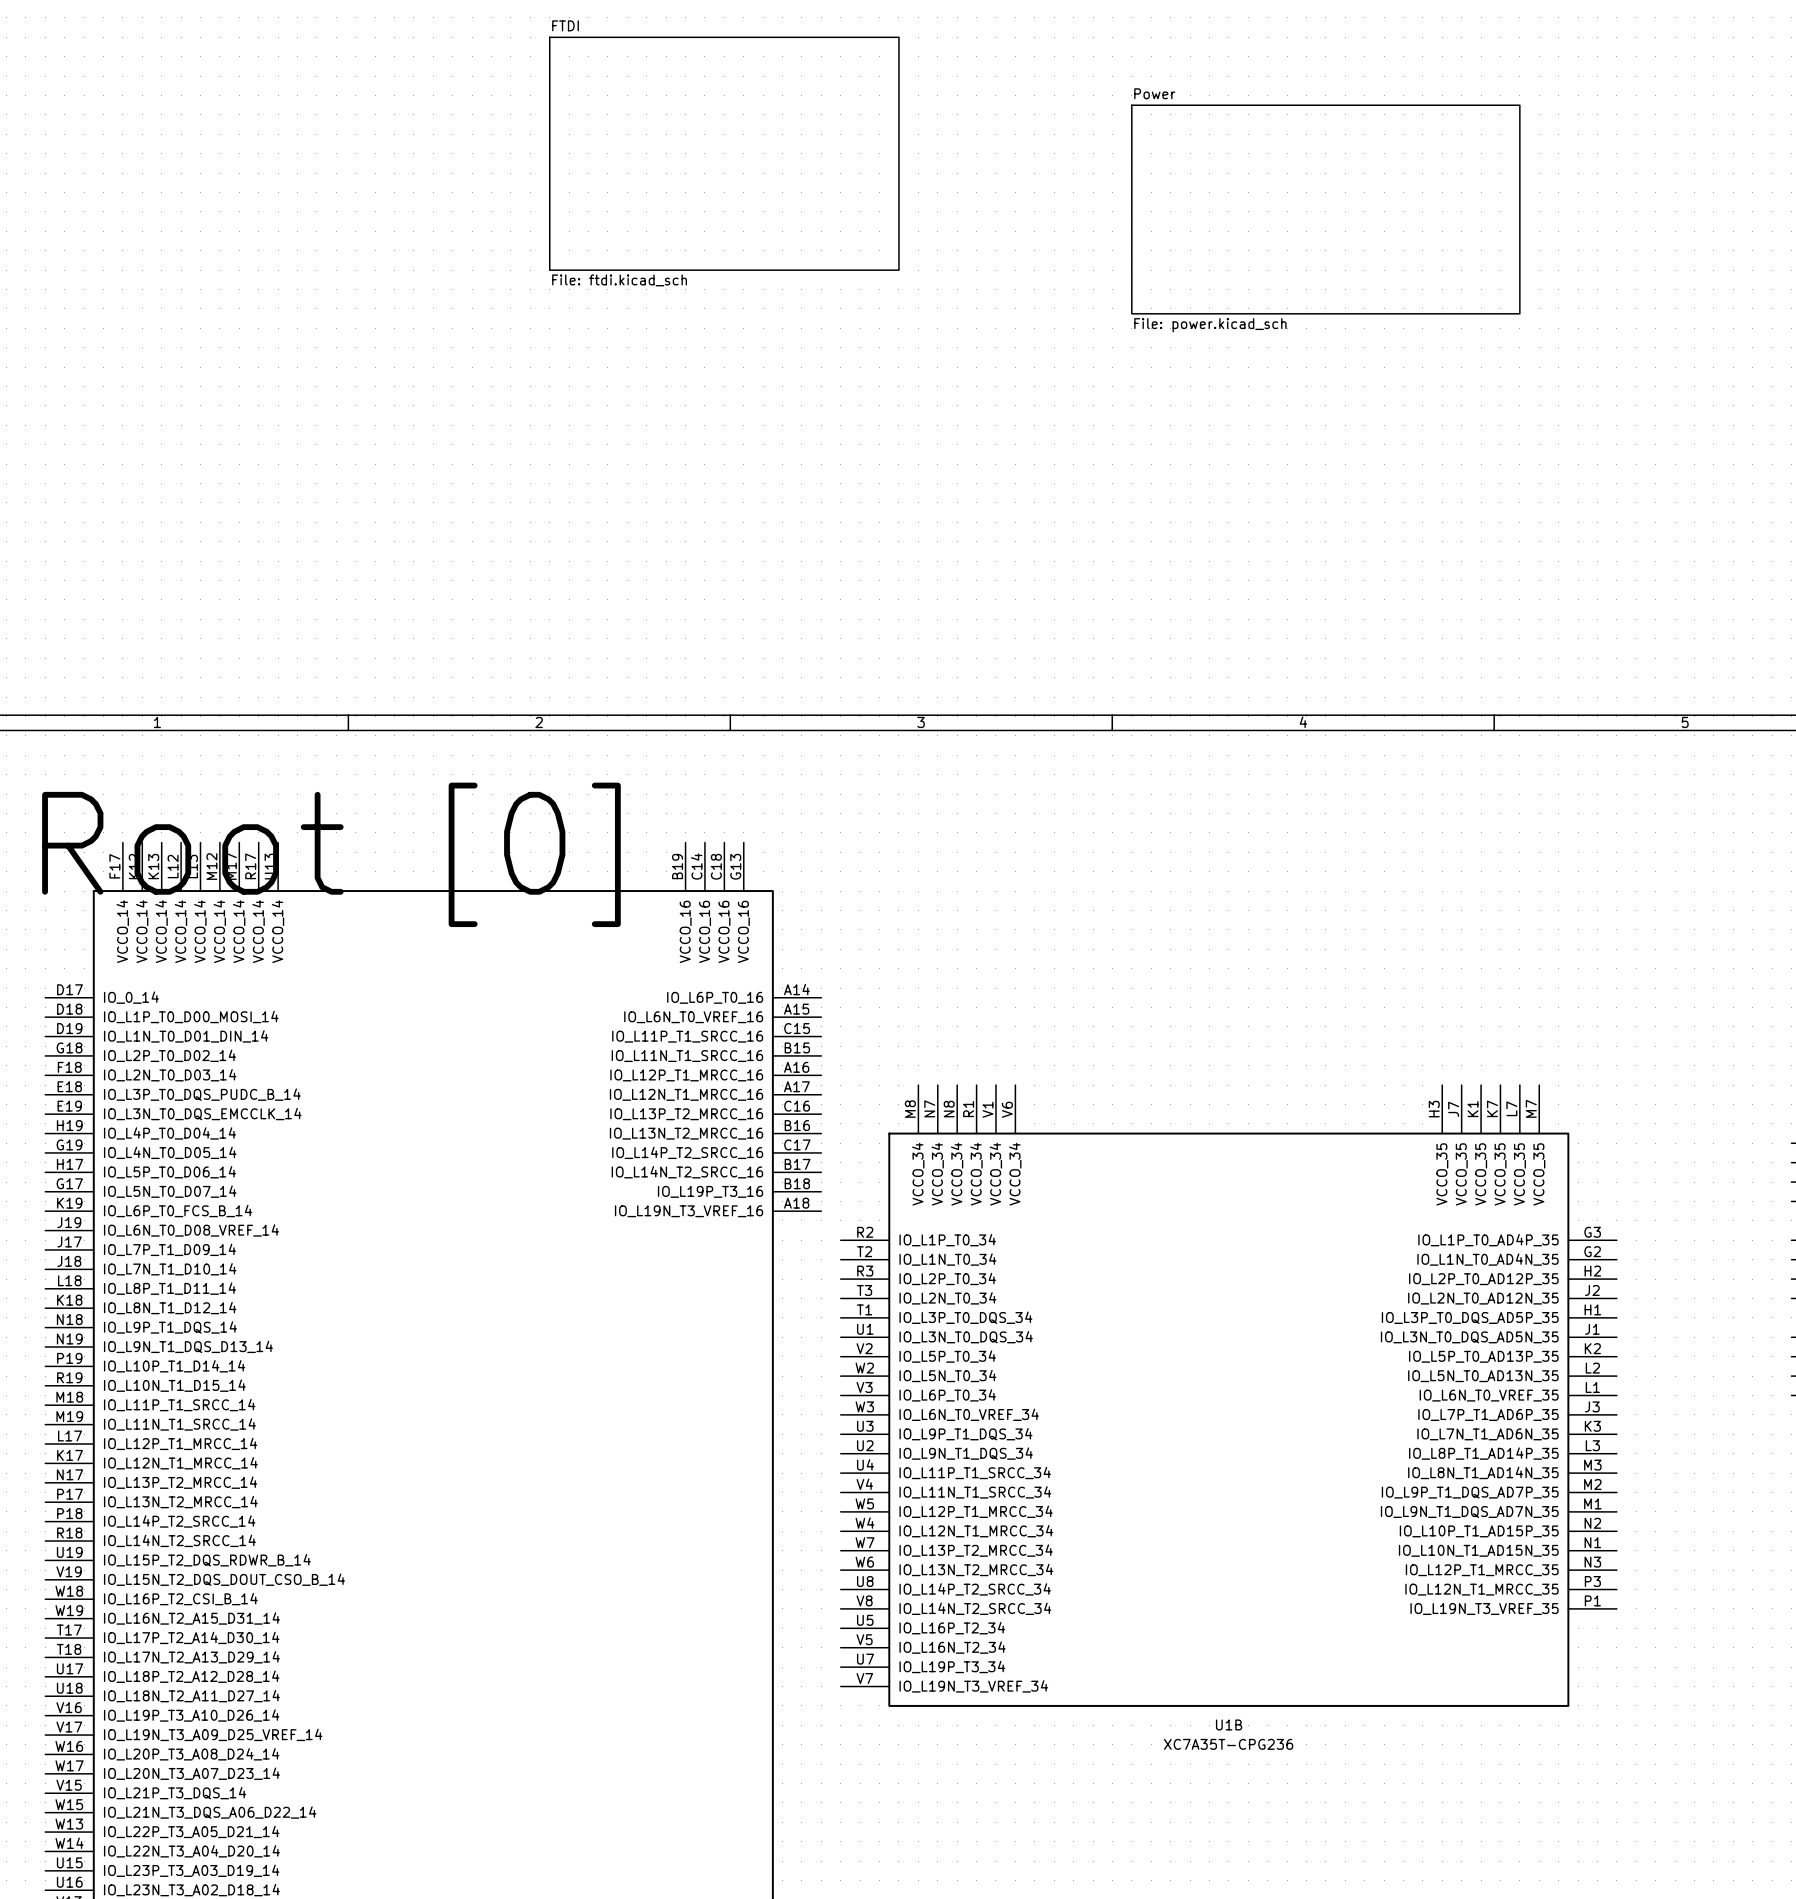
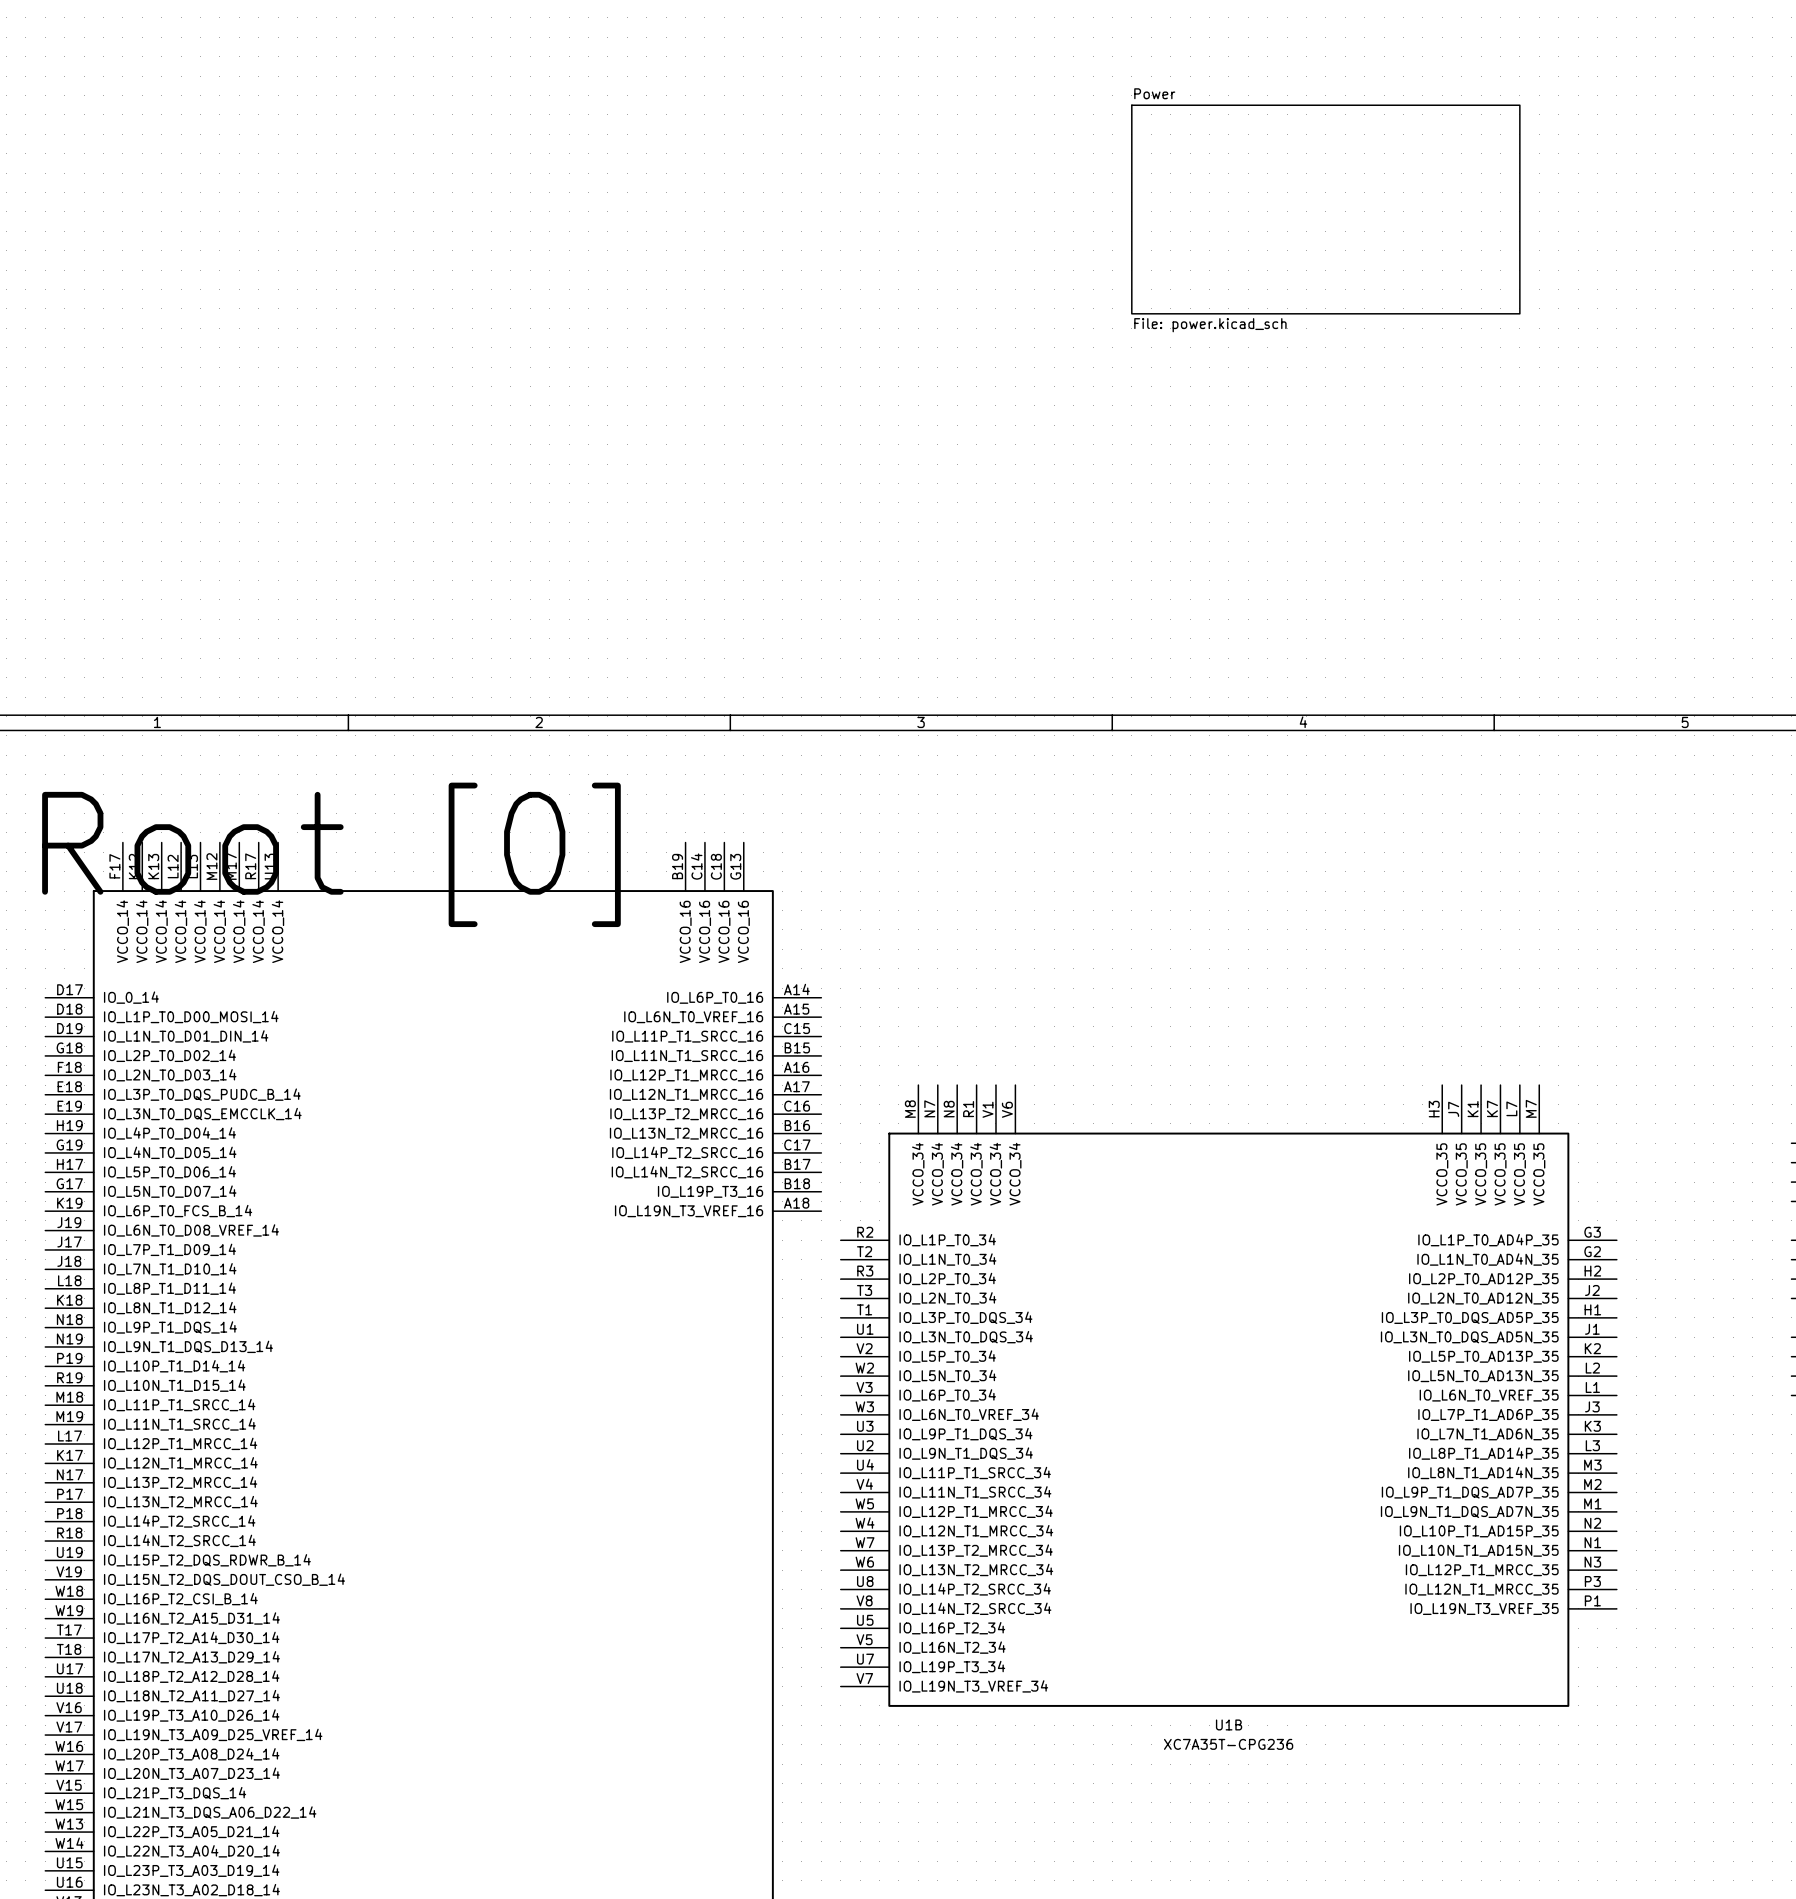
sheet FTDI: File: ftdi.kicad_sch (724, 153) -> none

